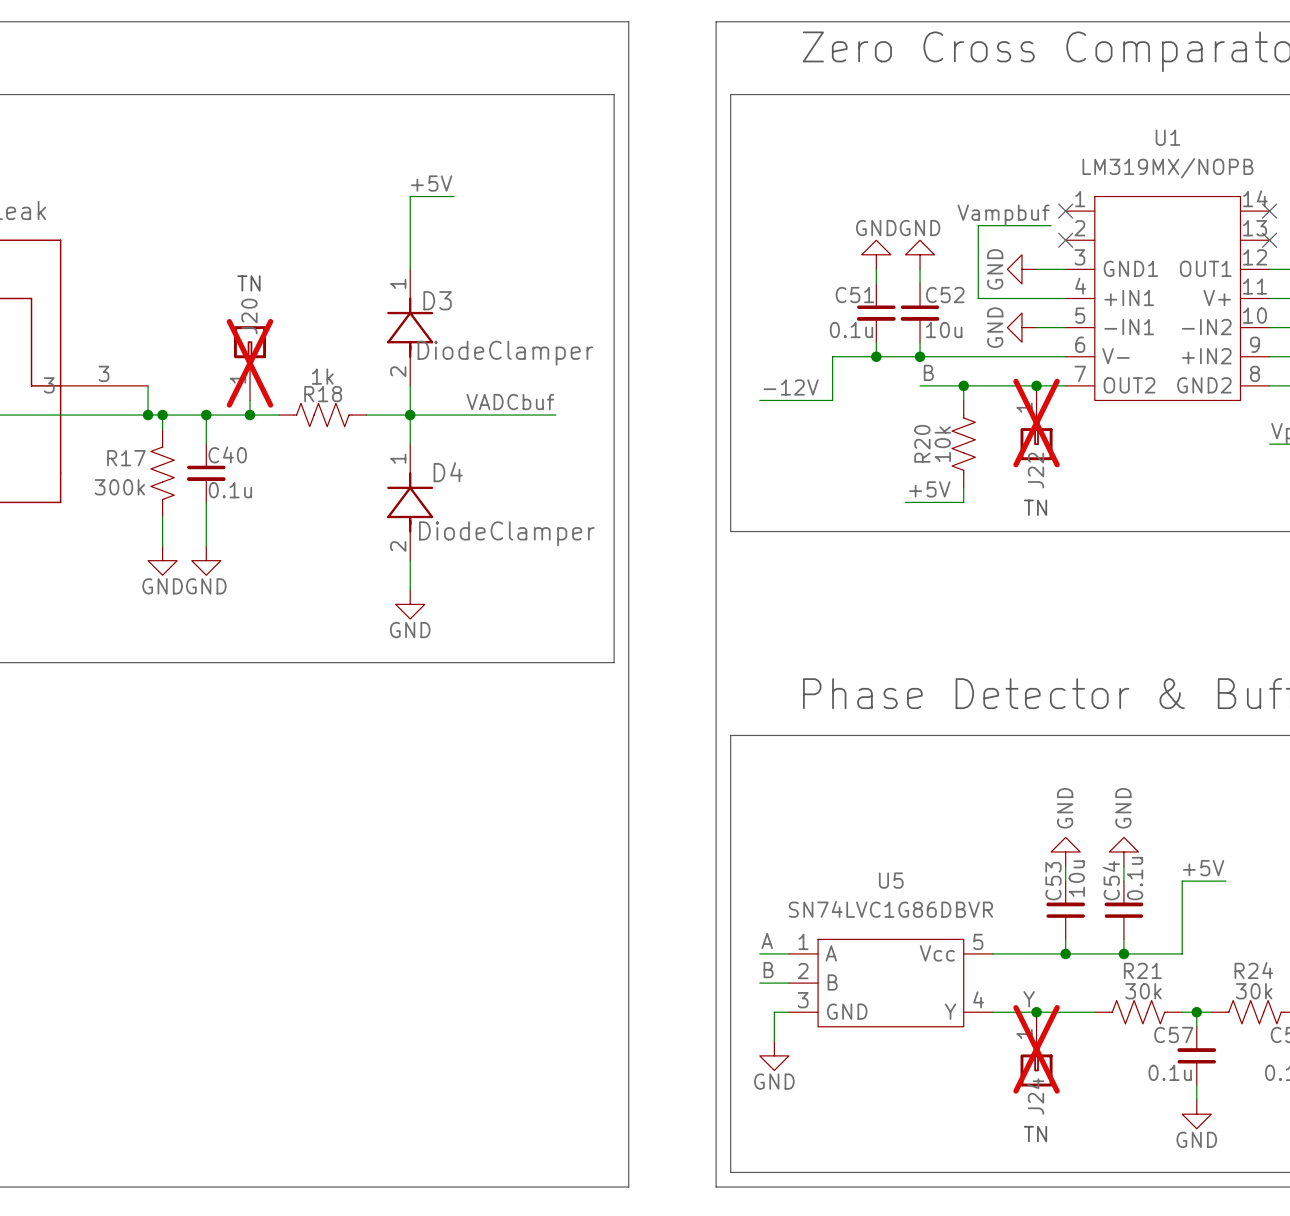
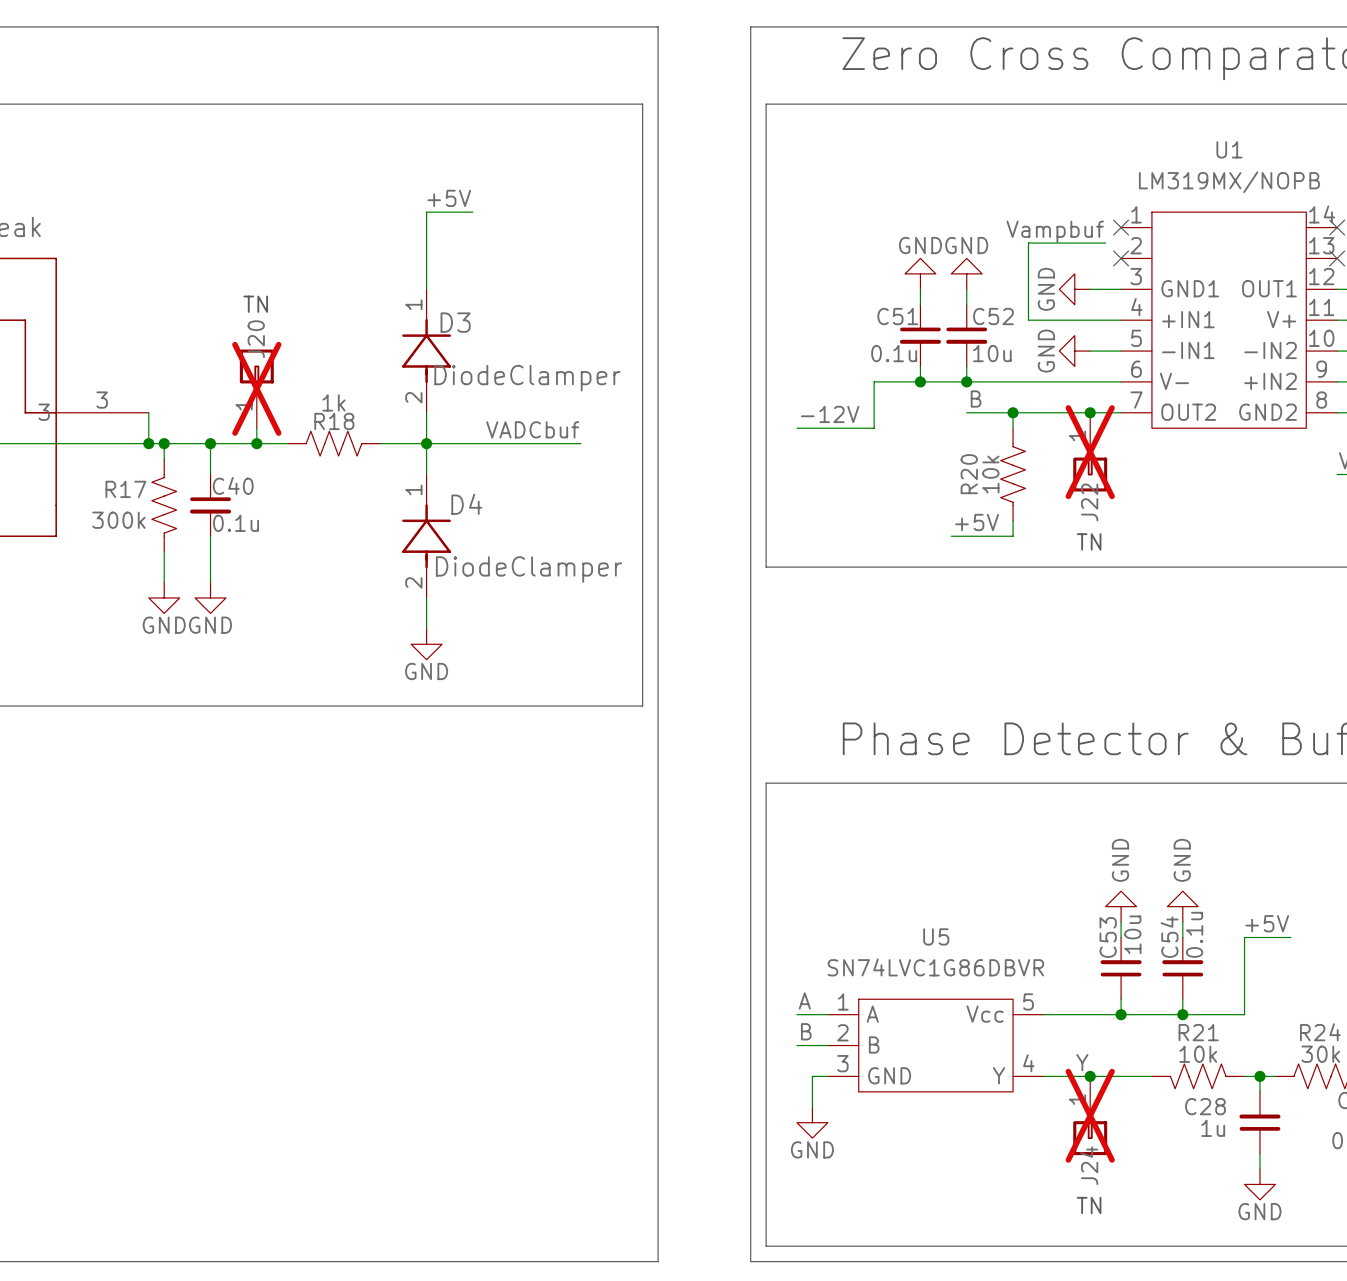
R21 value: 30k (1143, 991) -> 10k (1198, 1054)
R21 flip: as is (1138, 1012) -> left-right (1198, 1076)
C57 name: C57 (1173, 1034) -> C28 (1205, 1106)
C57 value: 0.1u (1170, 1072) -> 1u (1213, 1128)

